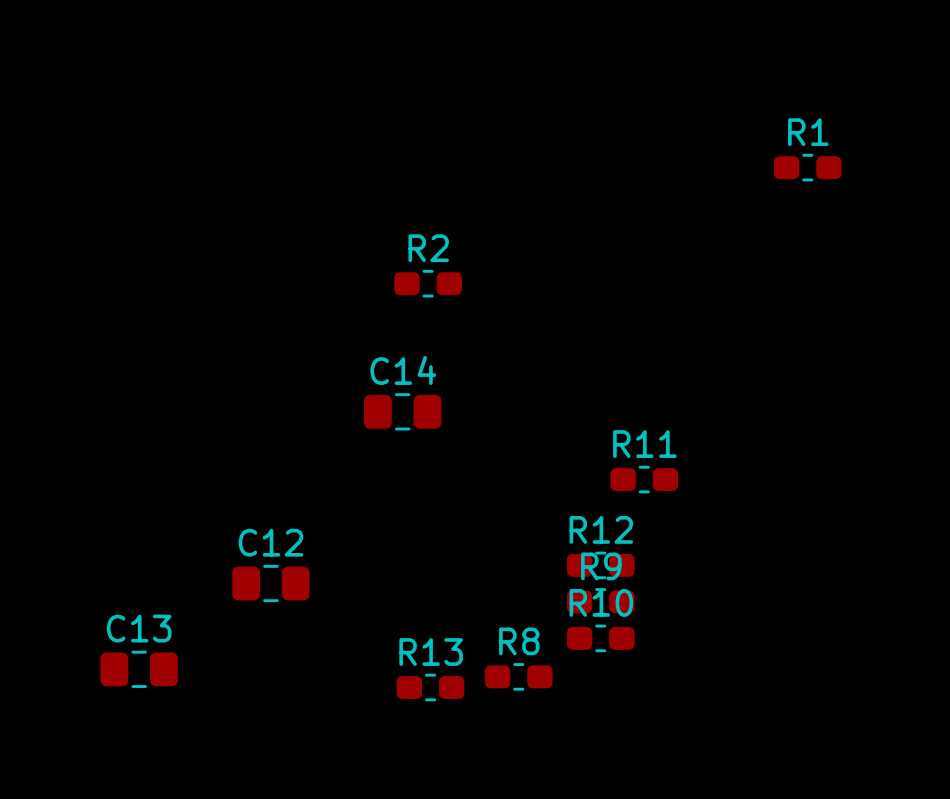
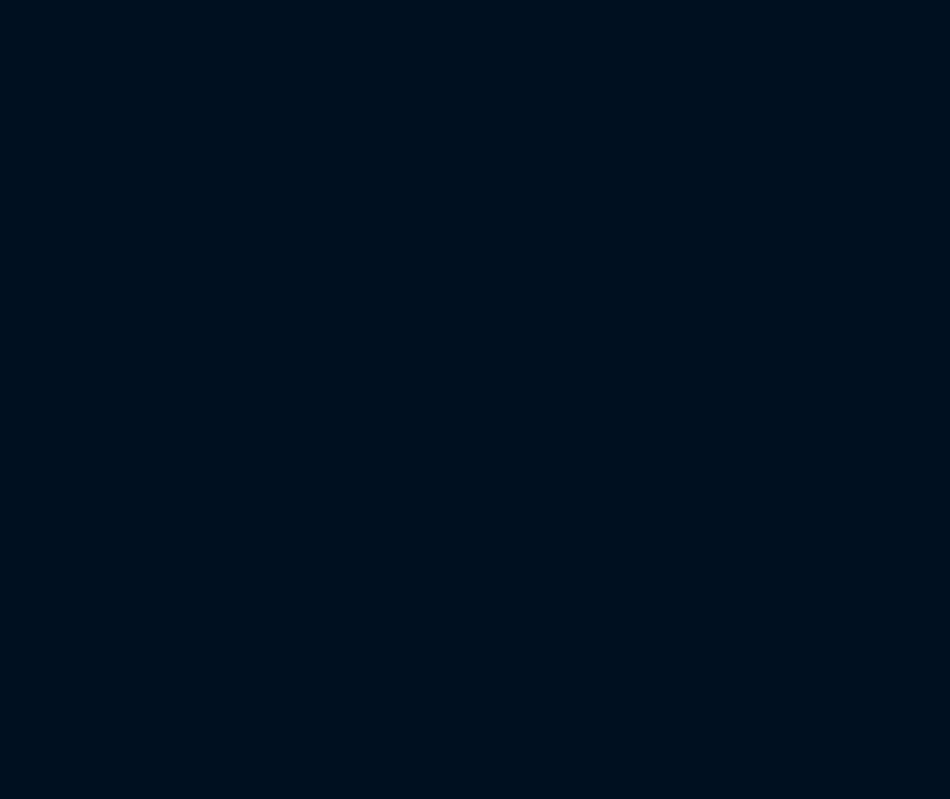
R1: (807, 167) -> none
R2: (428, 283) -> none
C14: (402, 411) -> none
R11: (644, 479) -> none
R12: (600, 565) -> none
C12: (270, 583) -> none
R9: (600, 601) -> none
R10: (600, 638) -> none
C13: (139, 669) -> none
R8: (518, 676) -> none
R13: (430, 687) -> none

